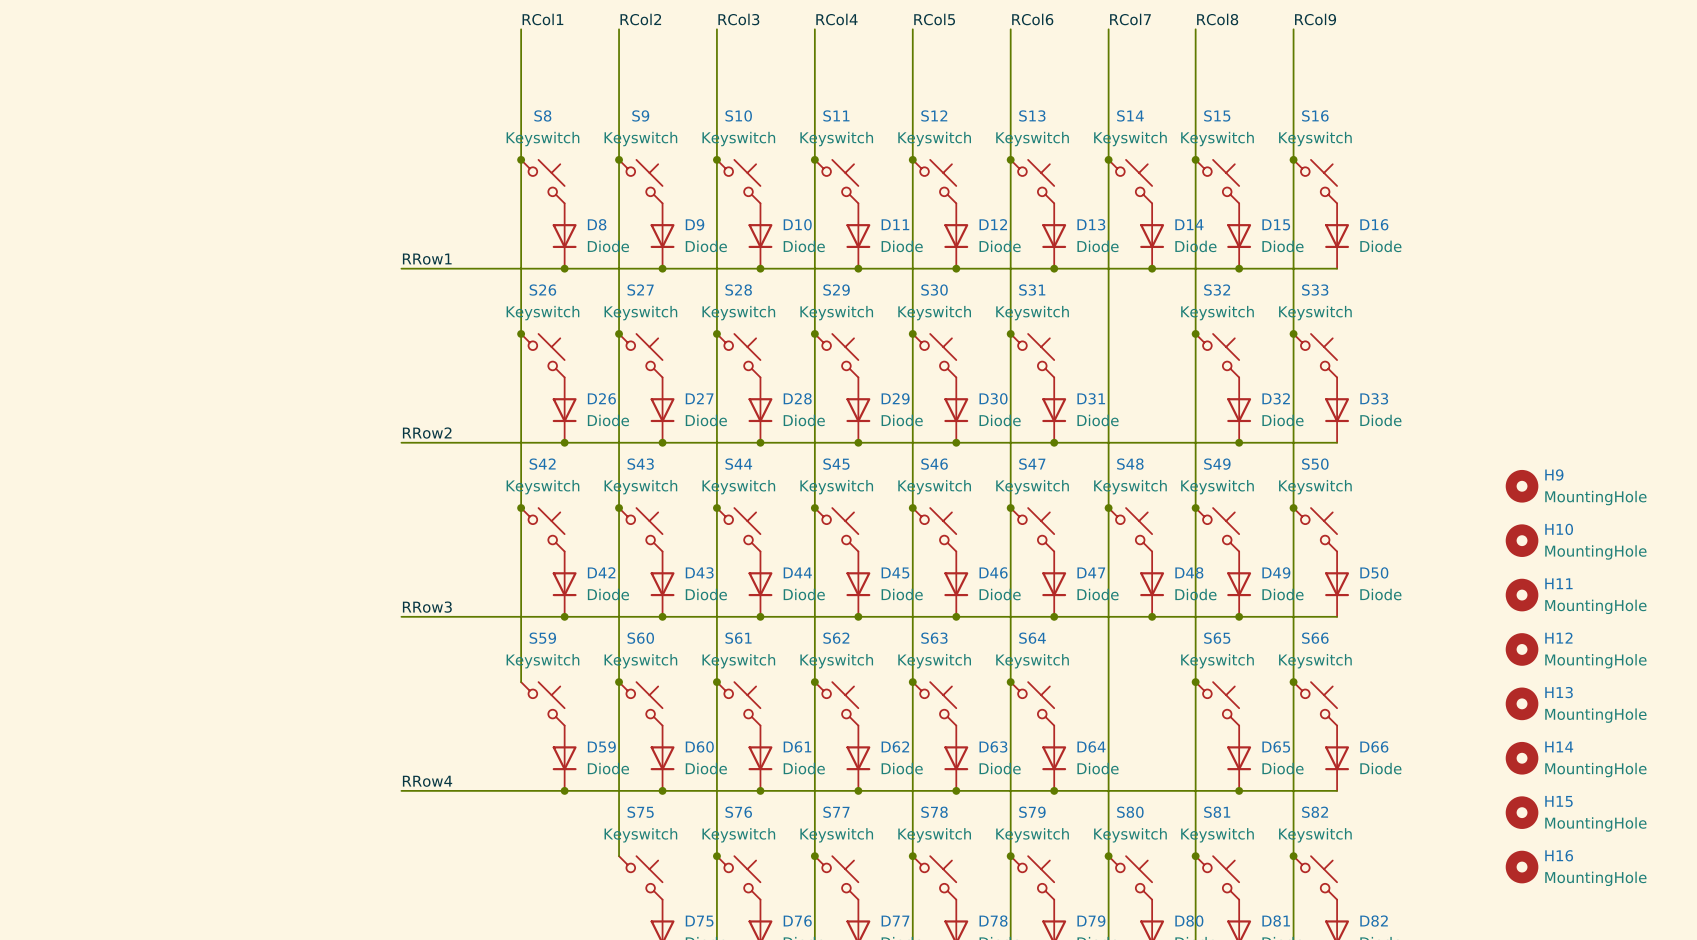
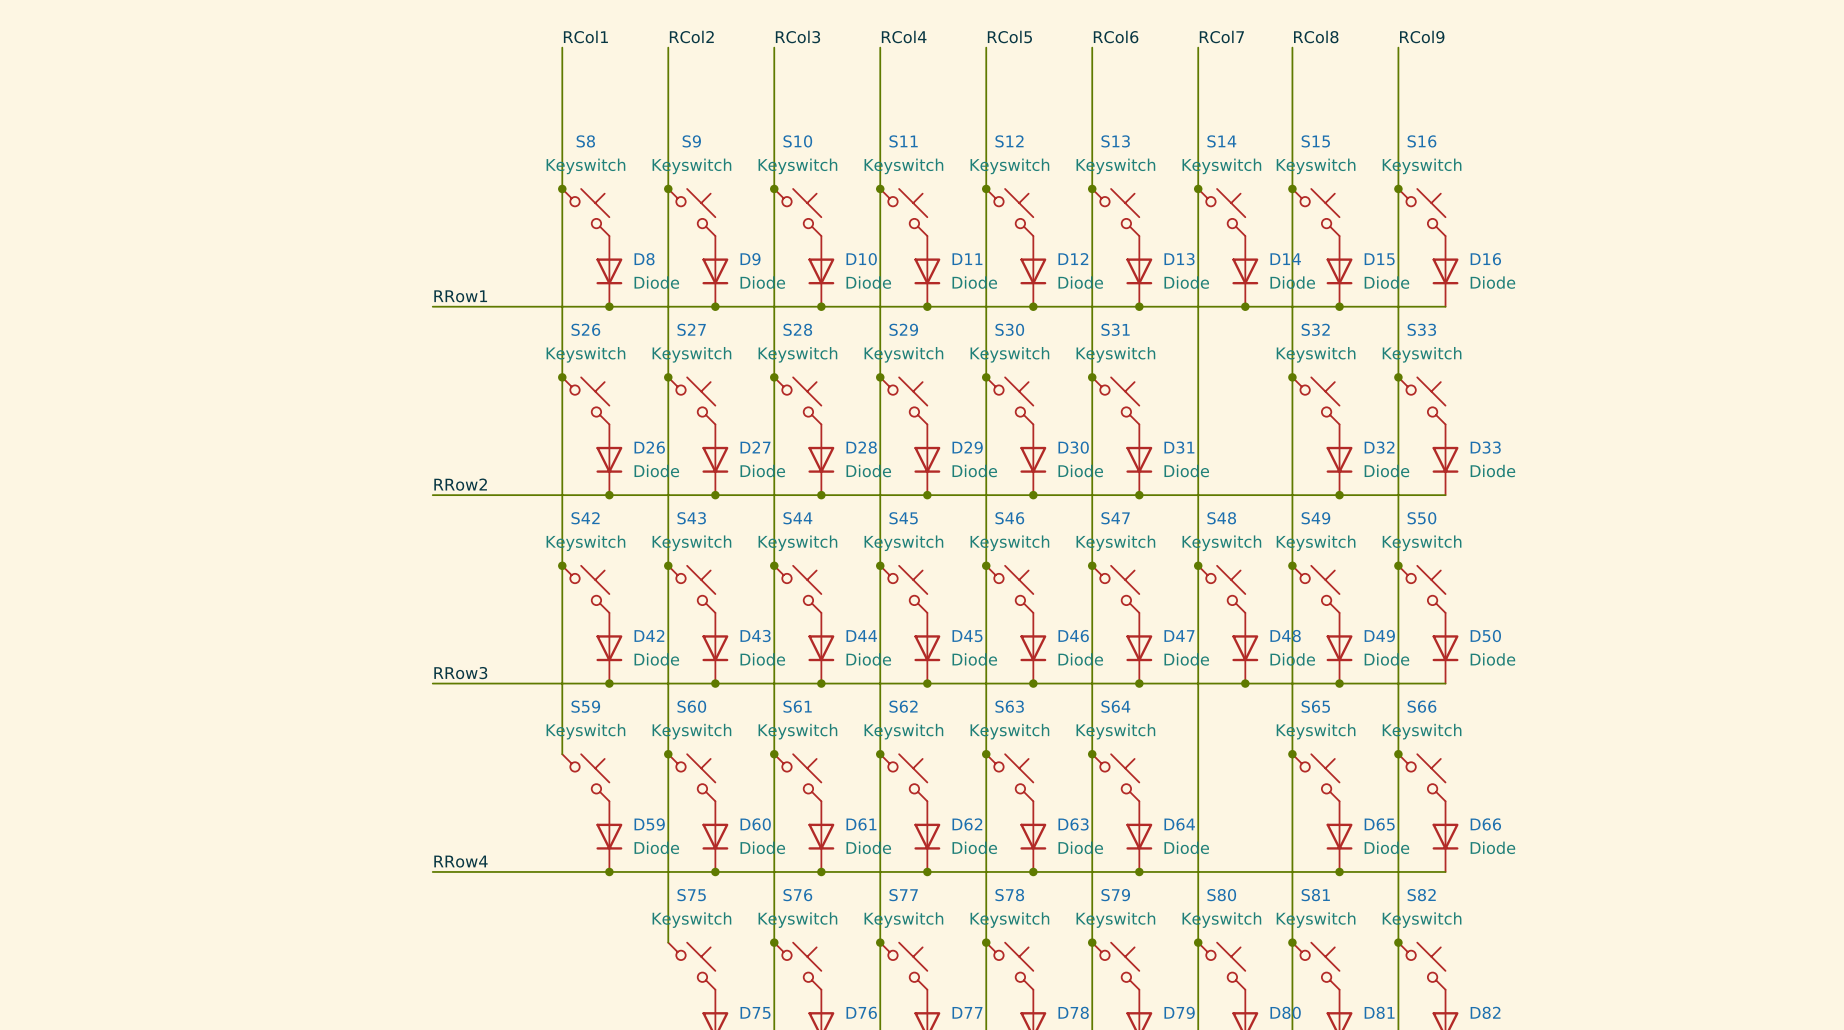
H9: MountingHole (1522, 486) -> none
H10: MountingHole (1522, 540) -> none
H11: MountingHole (1522, 595) -> none
H12: MountingHole (1522, 649) -> none
H13: MountingHole (1522, 703) -> none
H14: MountingHole (1522, 758) -> none
H15: MountingHole (1522, 812) -> none
H16: MountingHole (1522, 867) -> none

